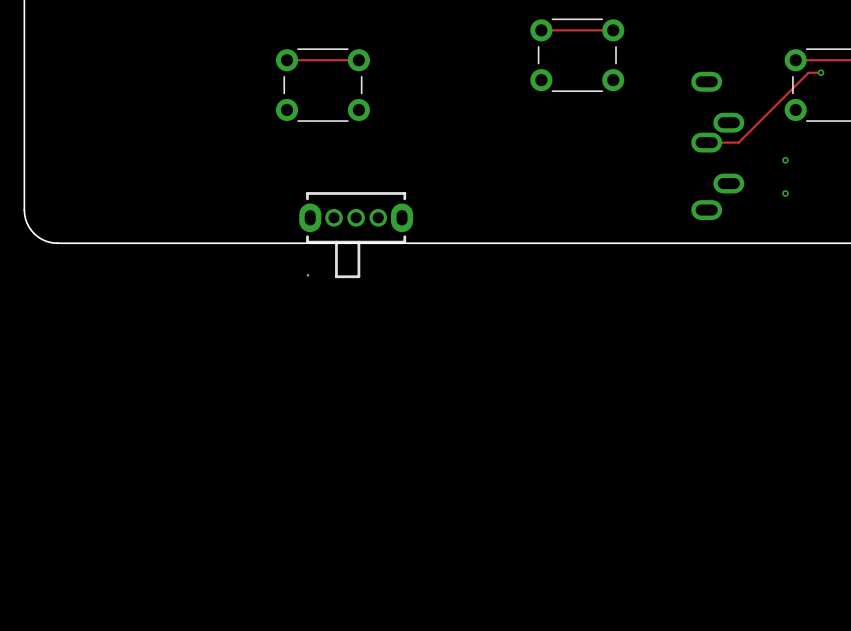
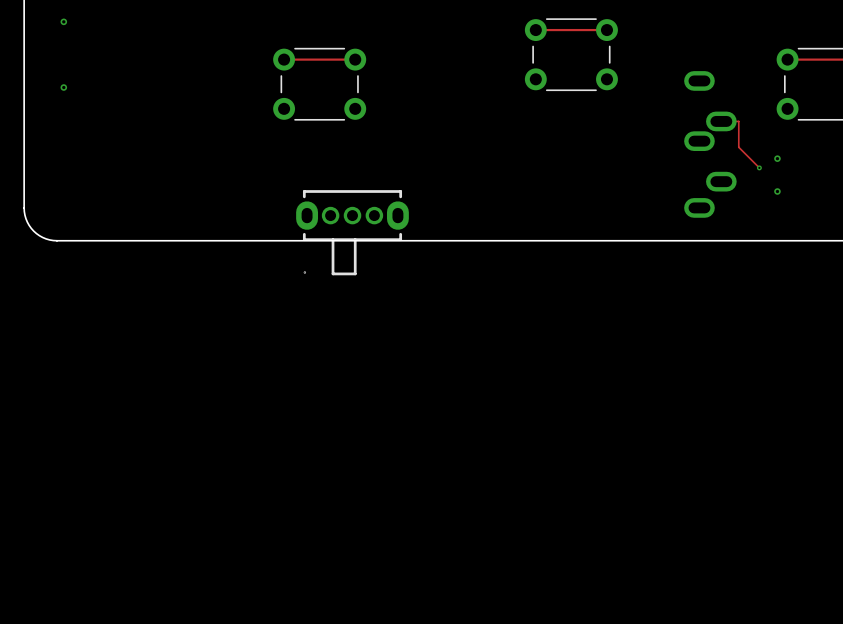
via: none -> (63, 21)
track: (820, 72) (808, 72) (738, 142) (706, 142) -> none
via: (820, 72) -> none
via: none -> (63, 87)
track: none -> (721, 121) (738, 121) (738, 147) (759, 167)
via: none -> (759, 167)

